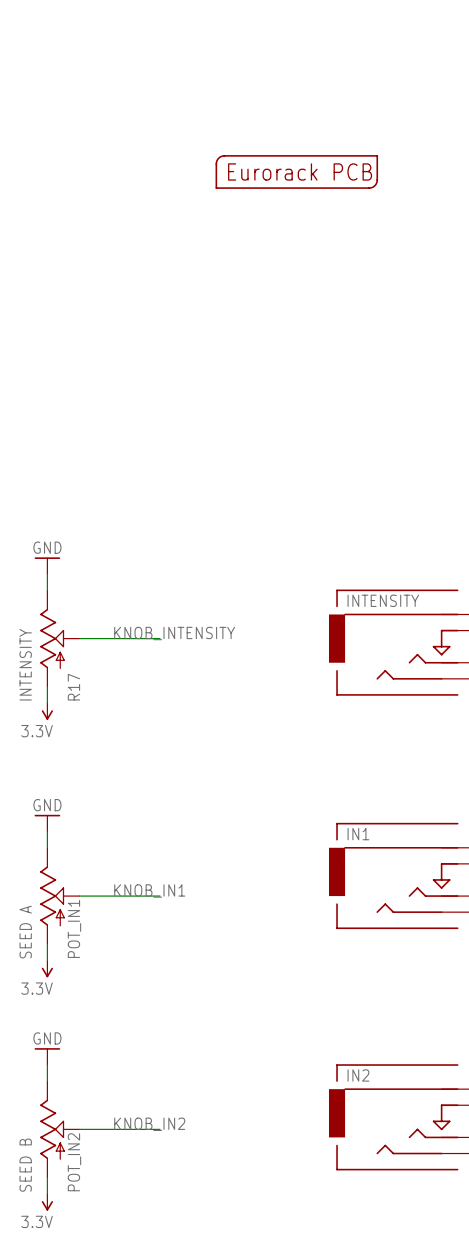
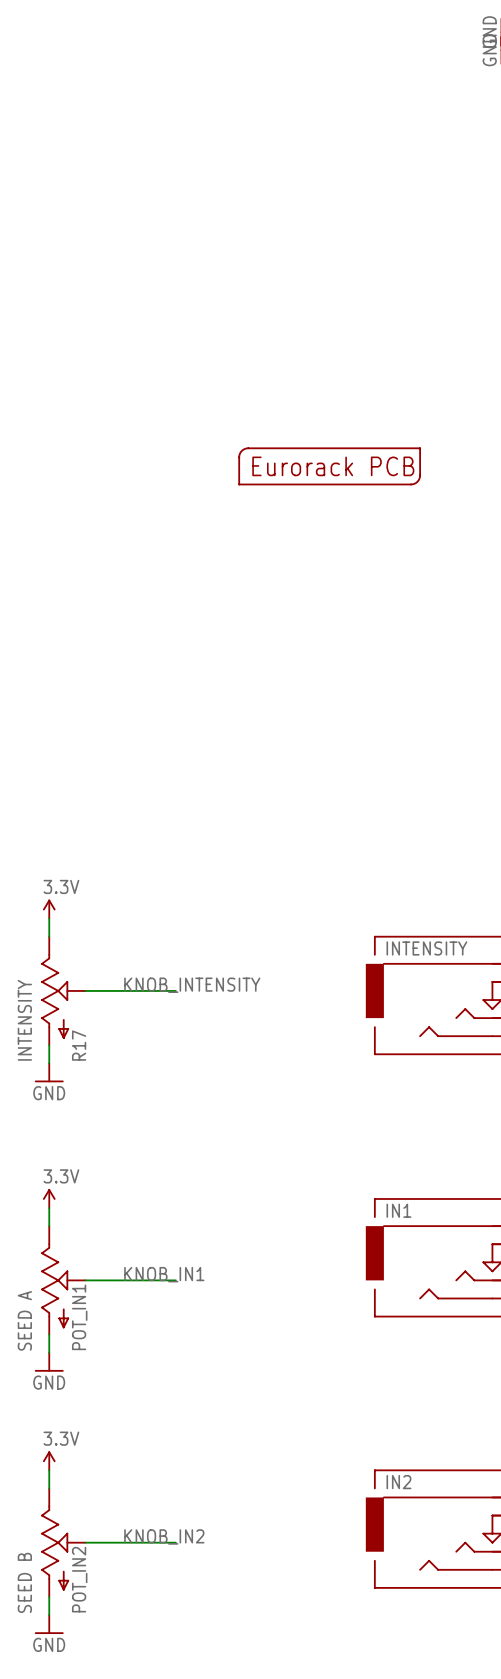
power symbol: GND (47, 565) -> 3.3V (49, 909)
R17 symbol: [40, 590, 80, 687] -> [41, 936, 86, 1046]
power symbol: 3.3V (47, 711) -> GND (49, 1072)
power symbol: GND (47, 823) -> 3.3V (49, 1198)
POT_IN1 symbol: [40, 847, 80, 945] -> [41, 1226, 86, 1335]
power symbol: 3.3V (47, 968) -> GND (49, 1362)
power symbol: GND (47, 1056) -> 3.3V (49, 1460)
POT_IN2 symbol: [40, 1081, 80, 1178] -> [41, 1488, 86, 1597]
power symbol: 3.3V (47, 1202) -> GND (49, 1624)

